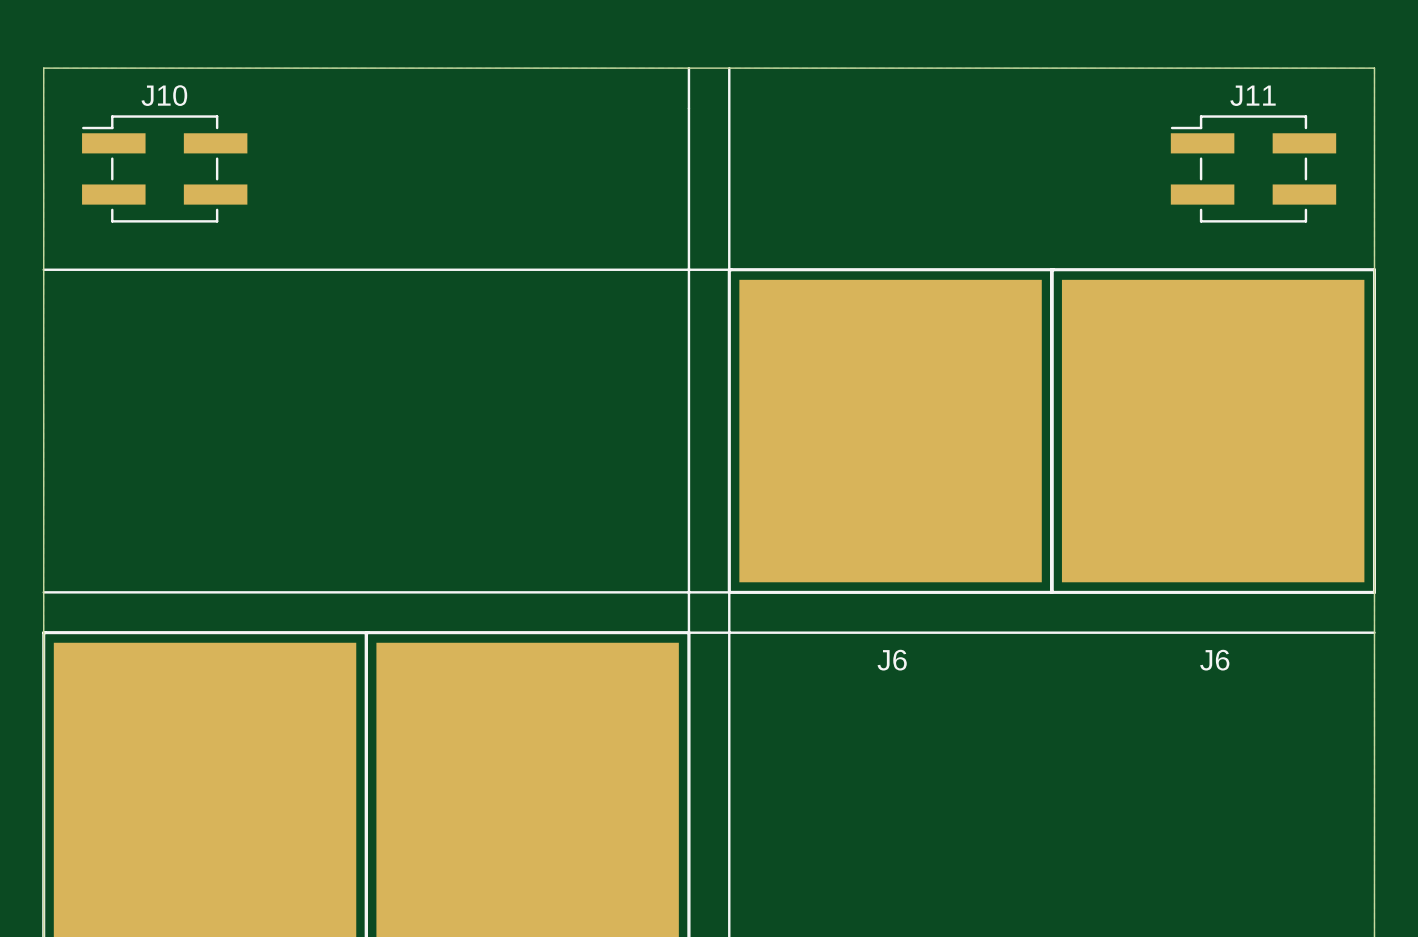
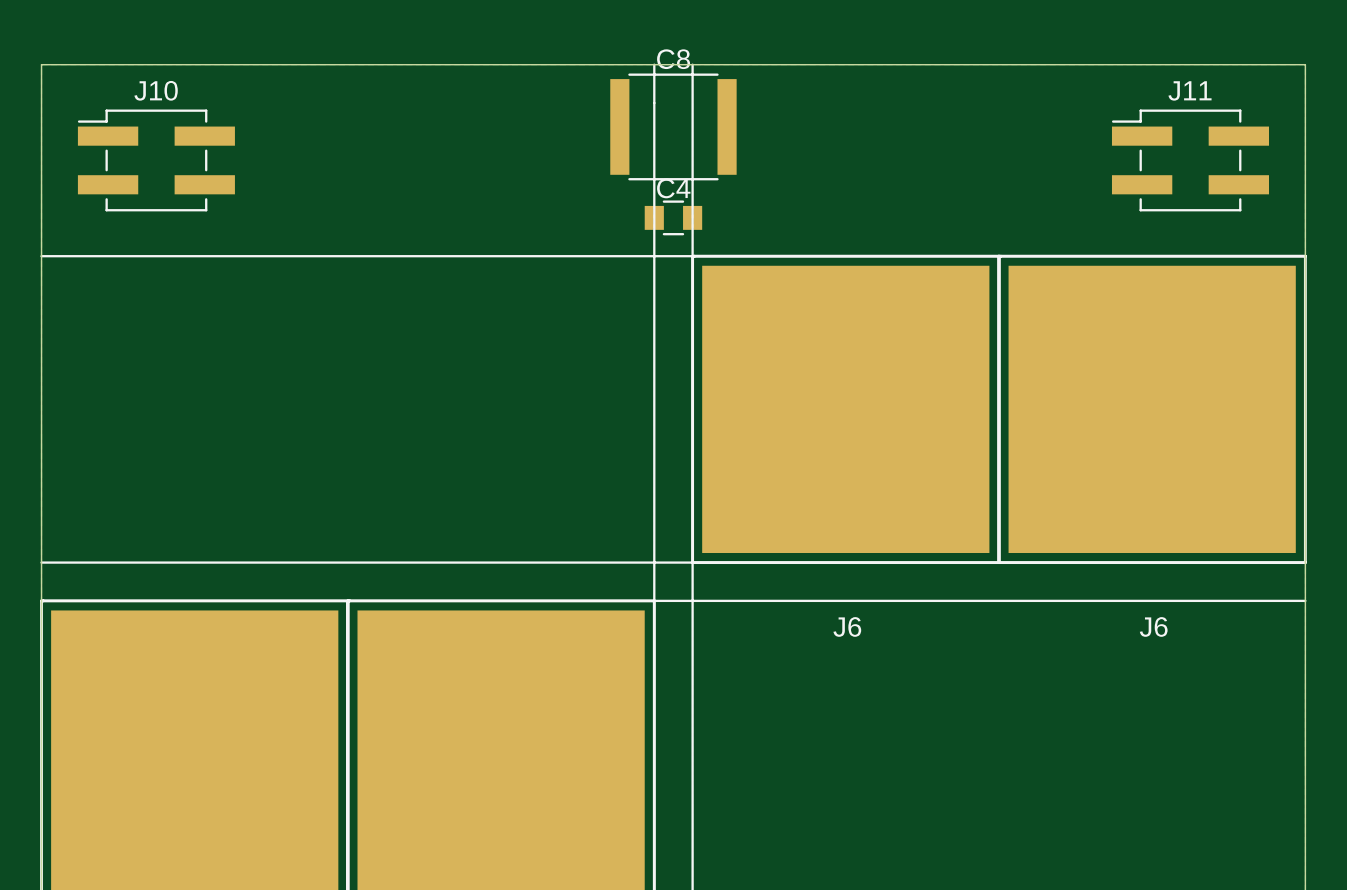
C8: none -> (673, 126)
C4: none -> (673, 217)

